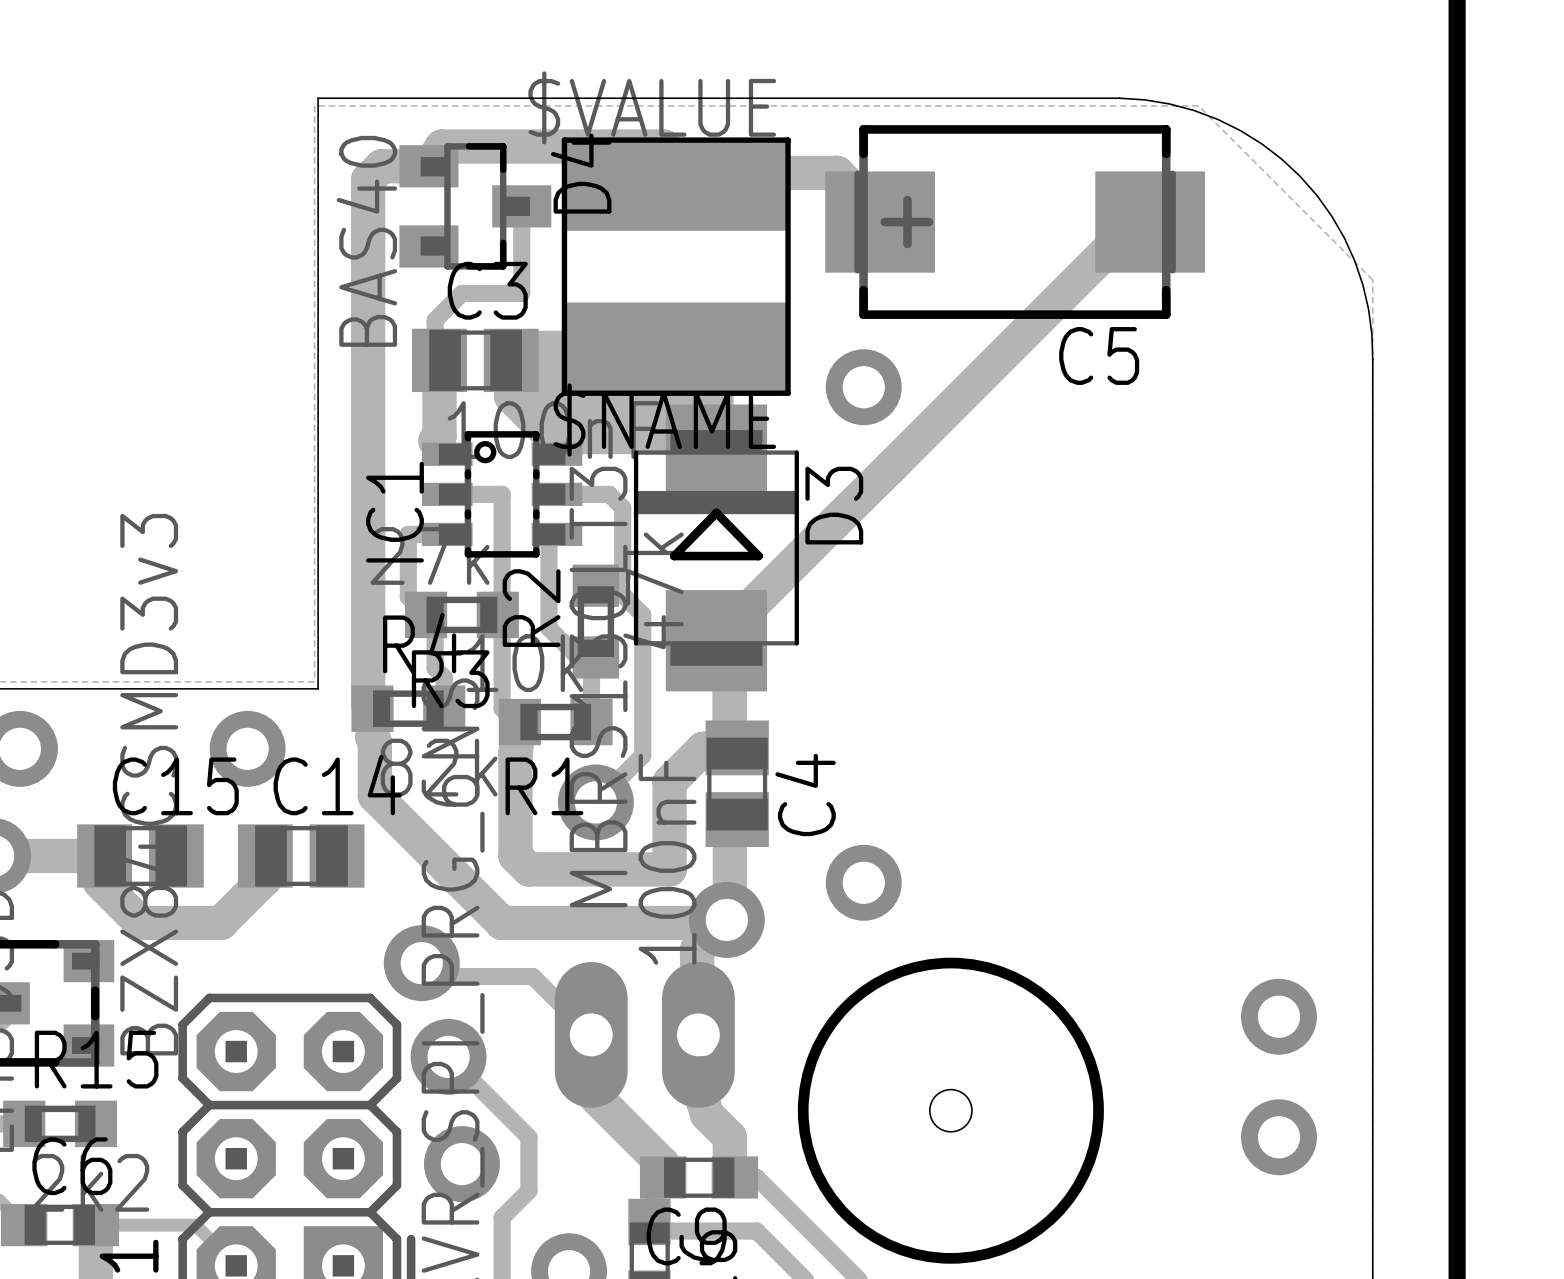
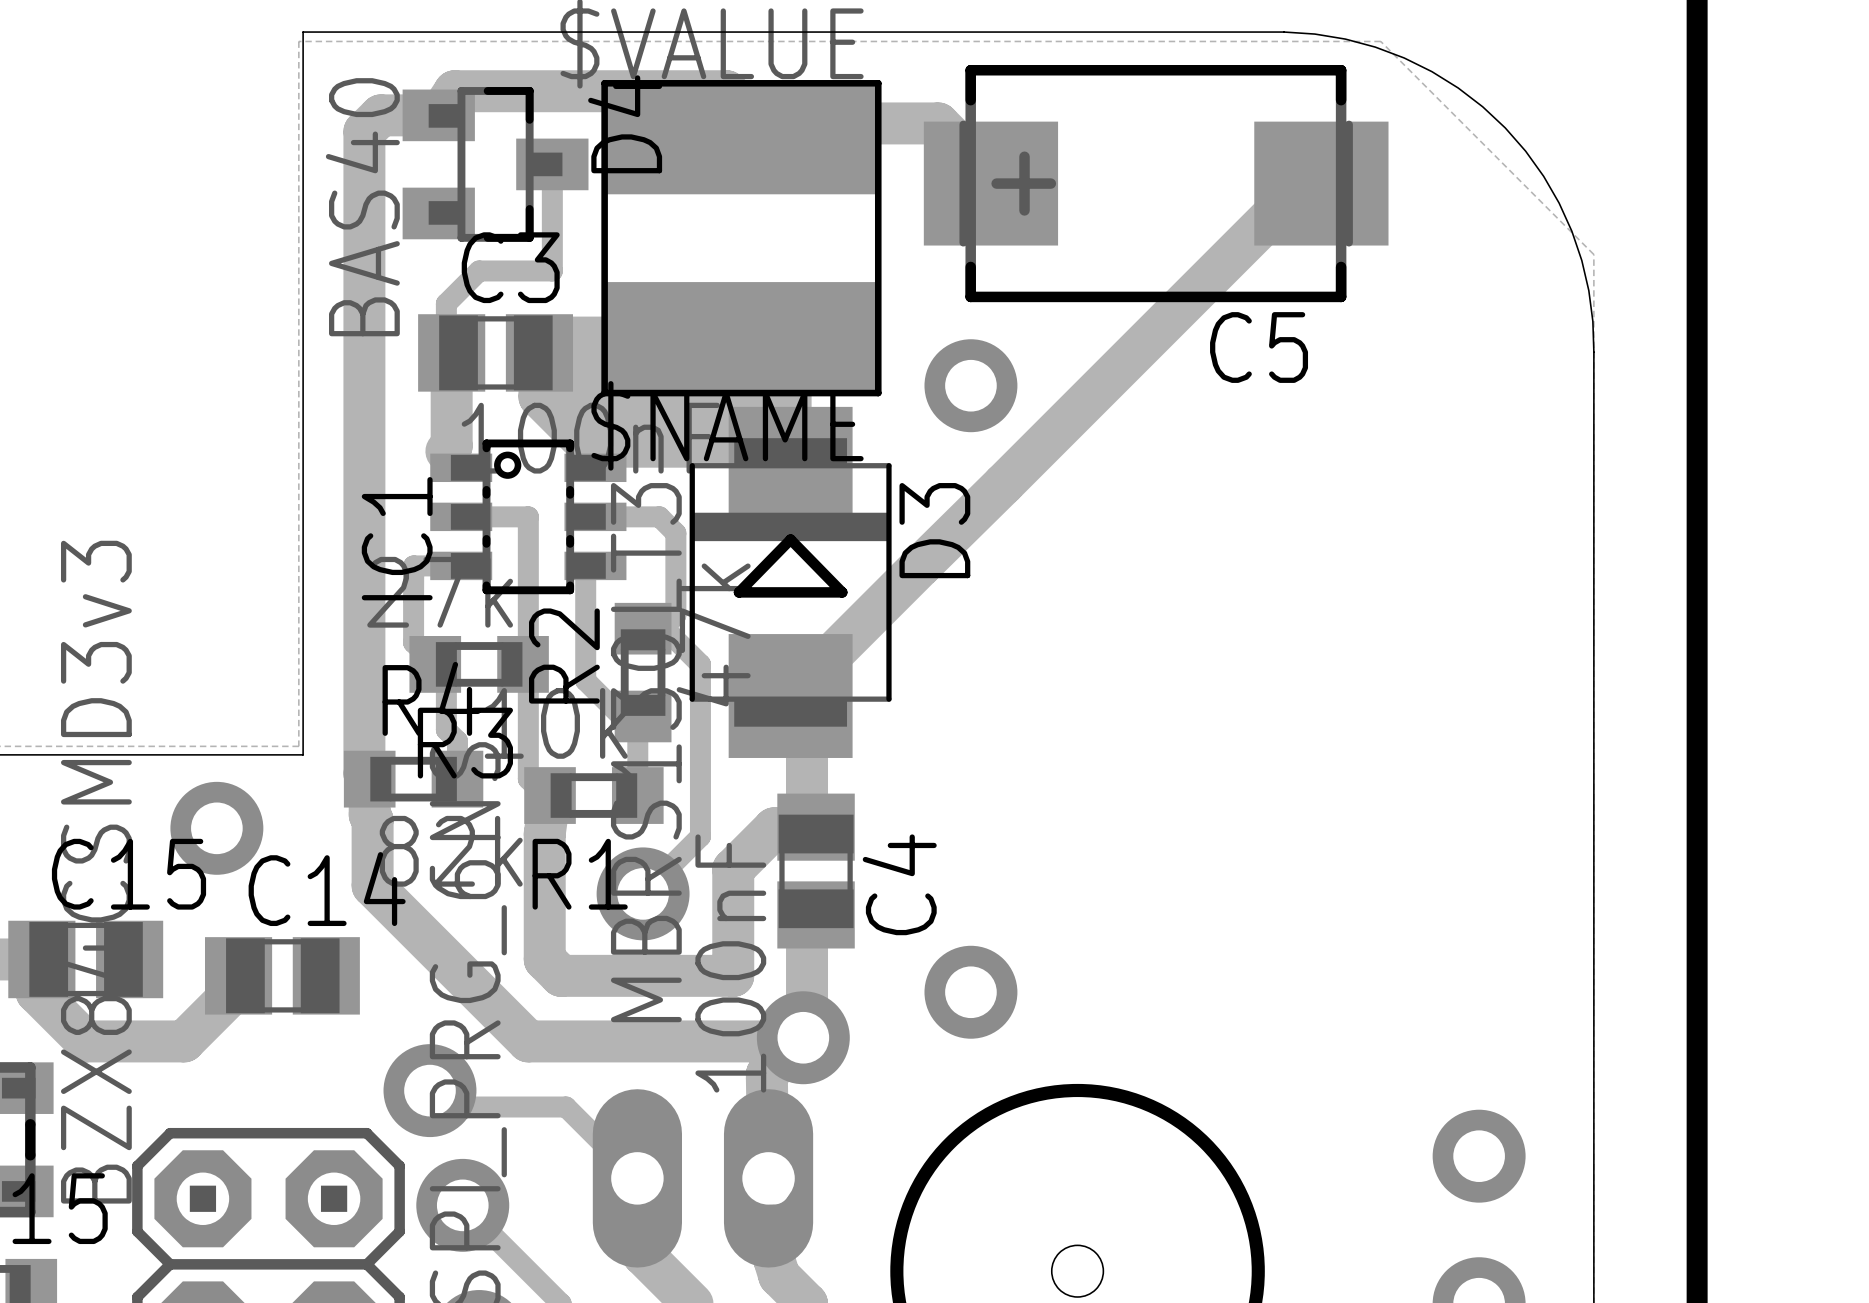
C14 position: (301, 856) -> (282, 975)

